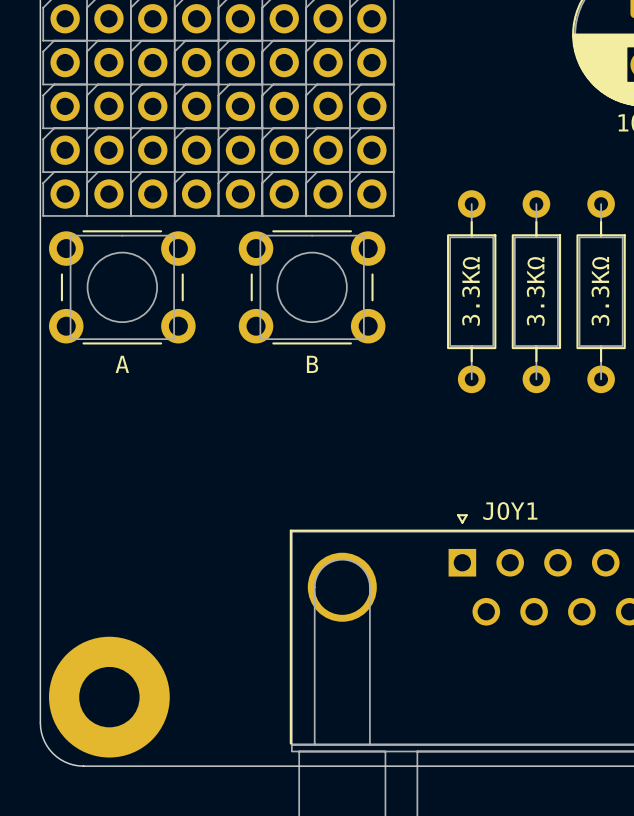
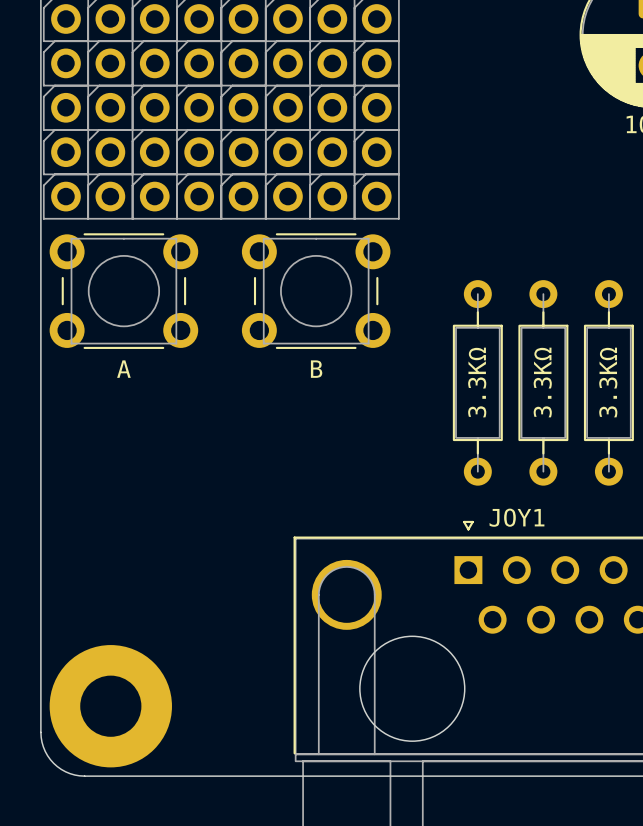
part: (471, 291) -> none
part: (536, 291) -> none
part: (601, 291) -> none
part: none -> (477, 382)
part: none -> (543, 382)
part: none -> (608, 382)
round board edge: none -> [359, 635, 466, 742]

